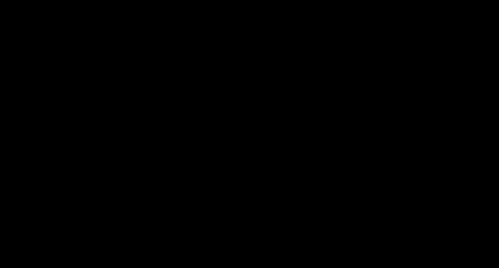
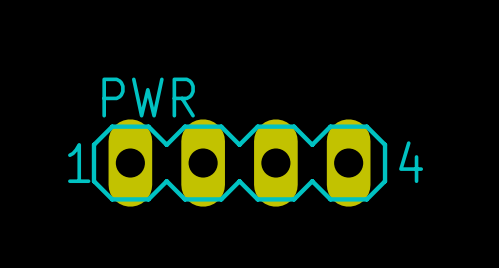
PWR: none -> (239, 163)

